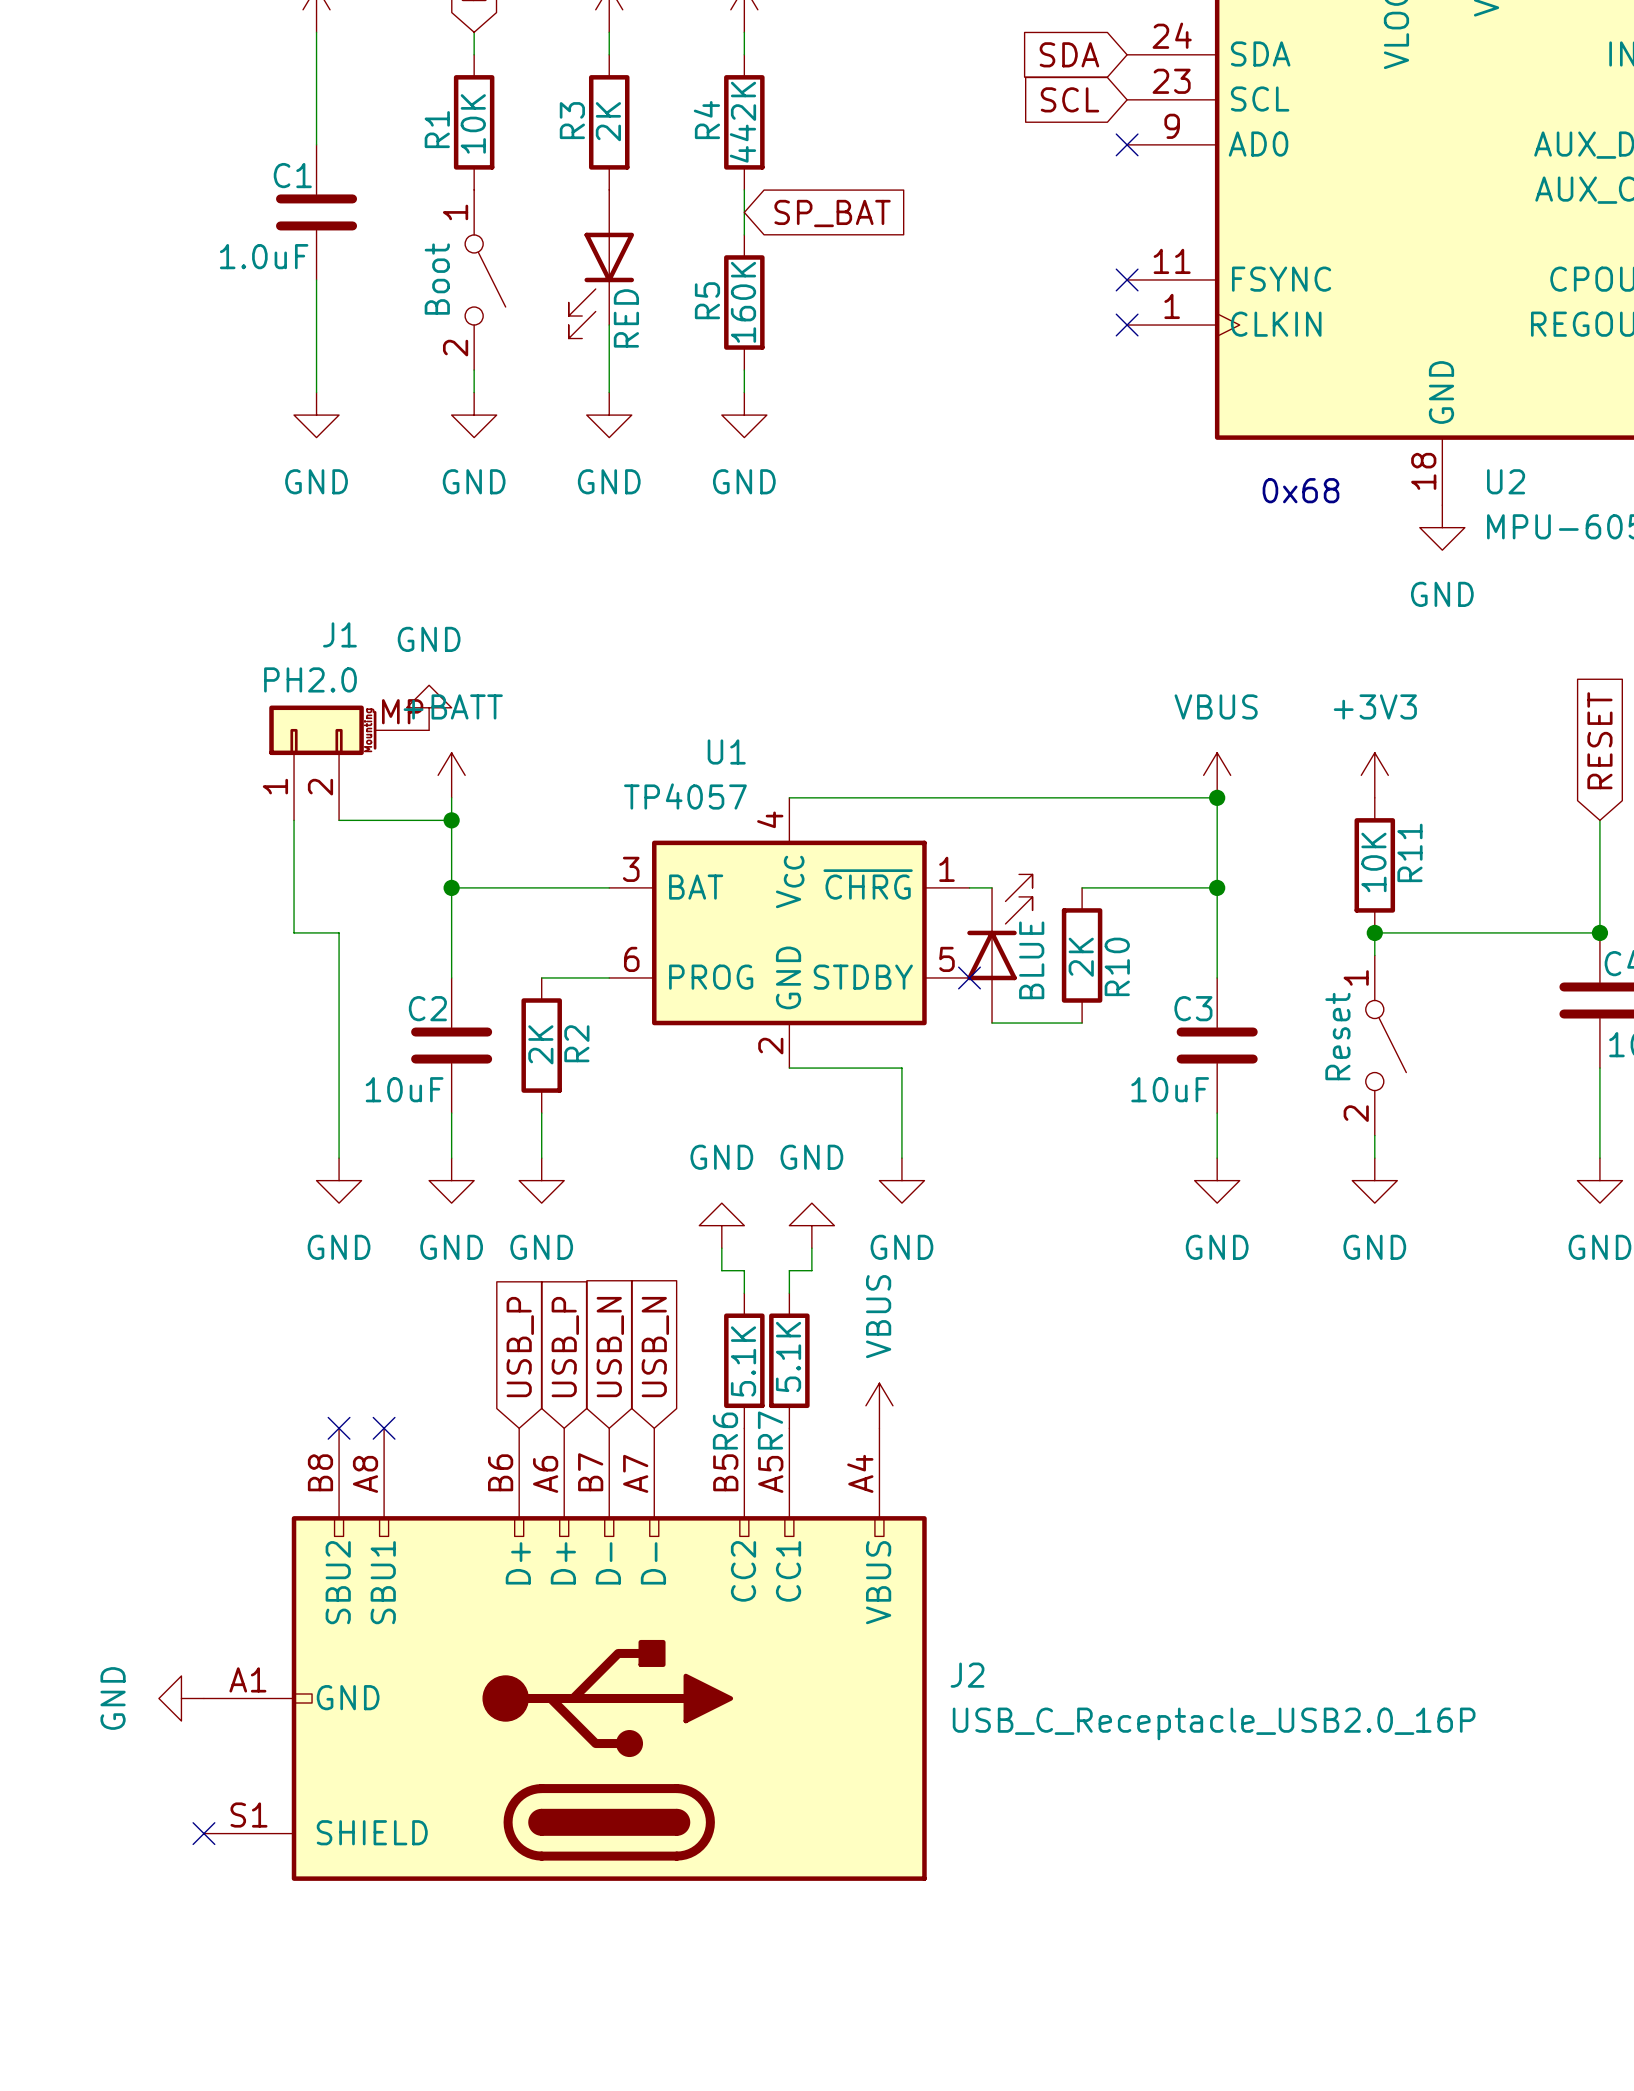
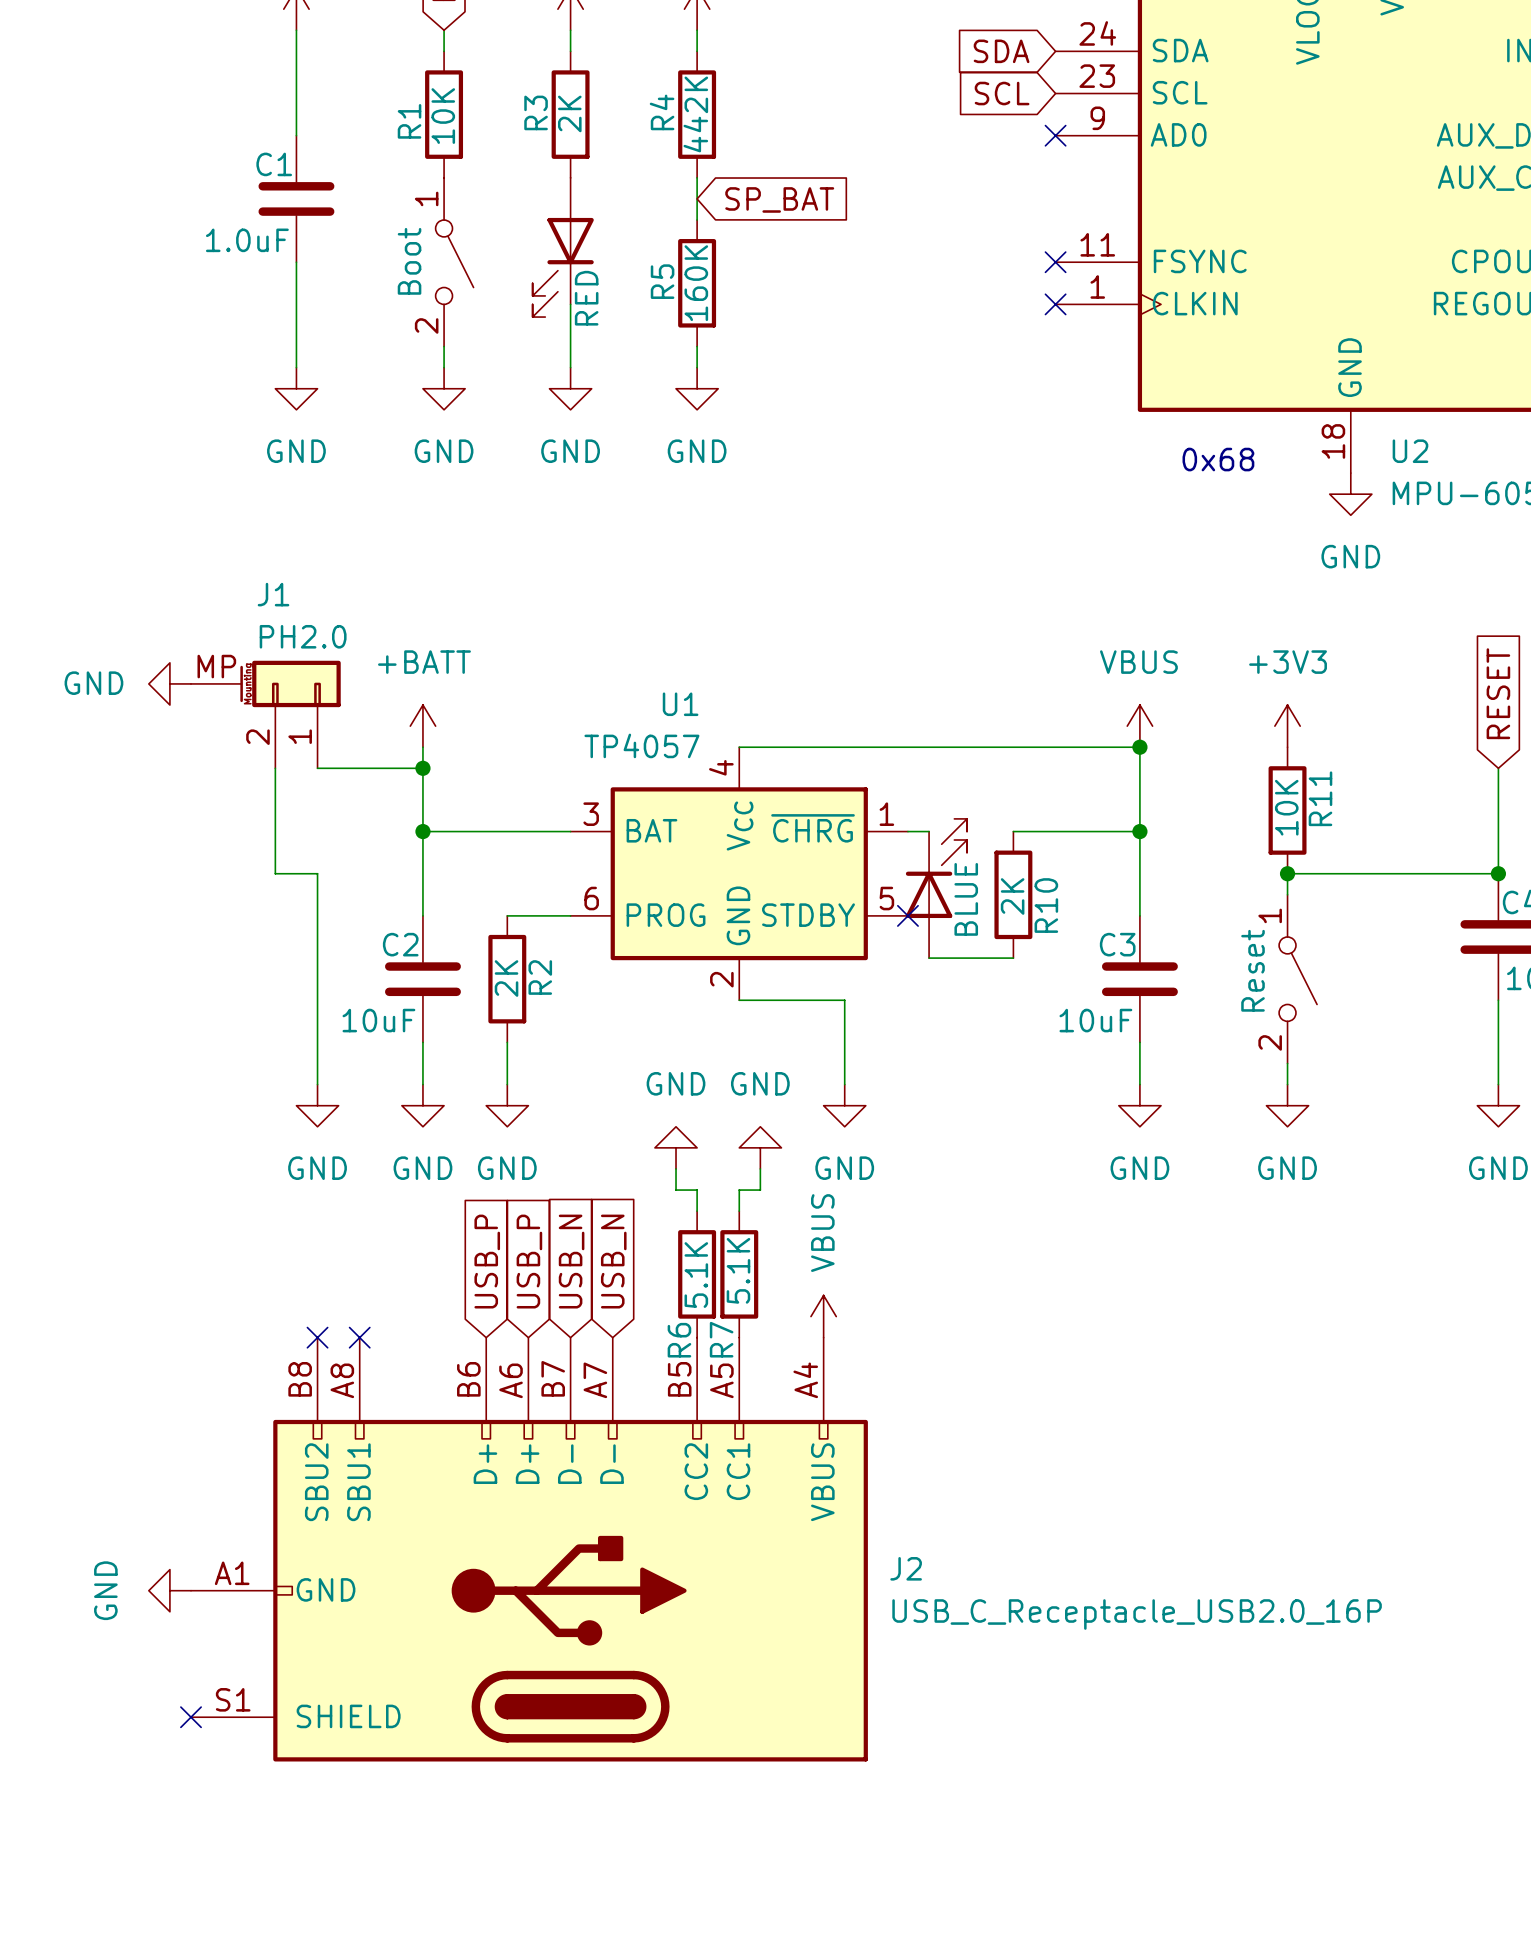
power symbol rotation: 0° (429, 707) -> 90° counterclockwise (169, 683)
power symbol position: GND (429, 707) -> GND (169, 683)
J1 flip: as is (322, 730) -> left-right (290, 683)

